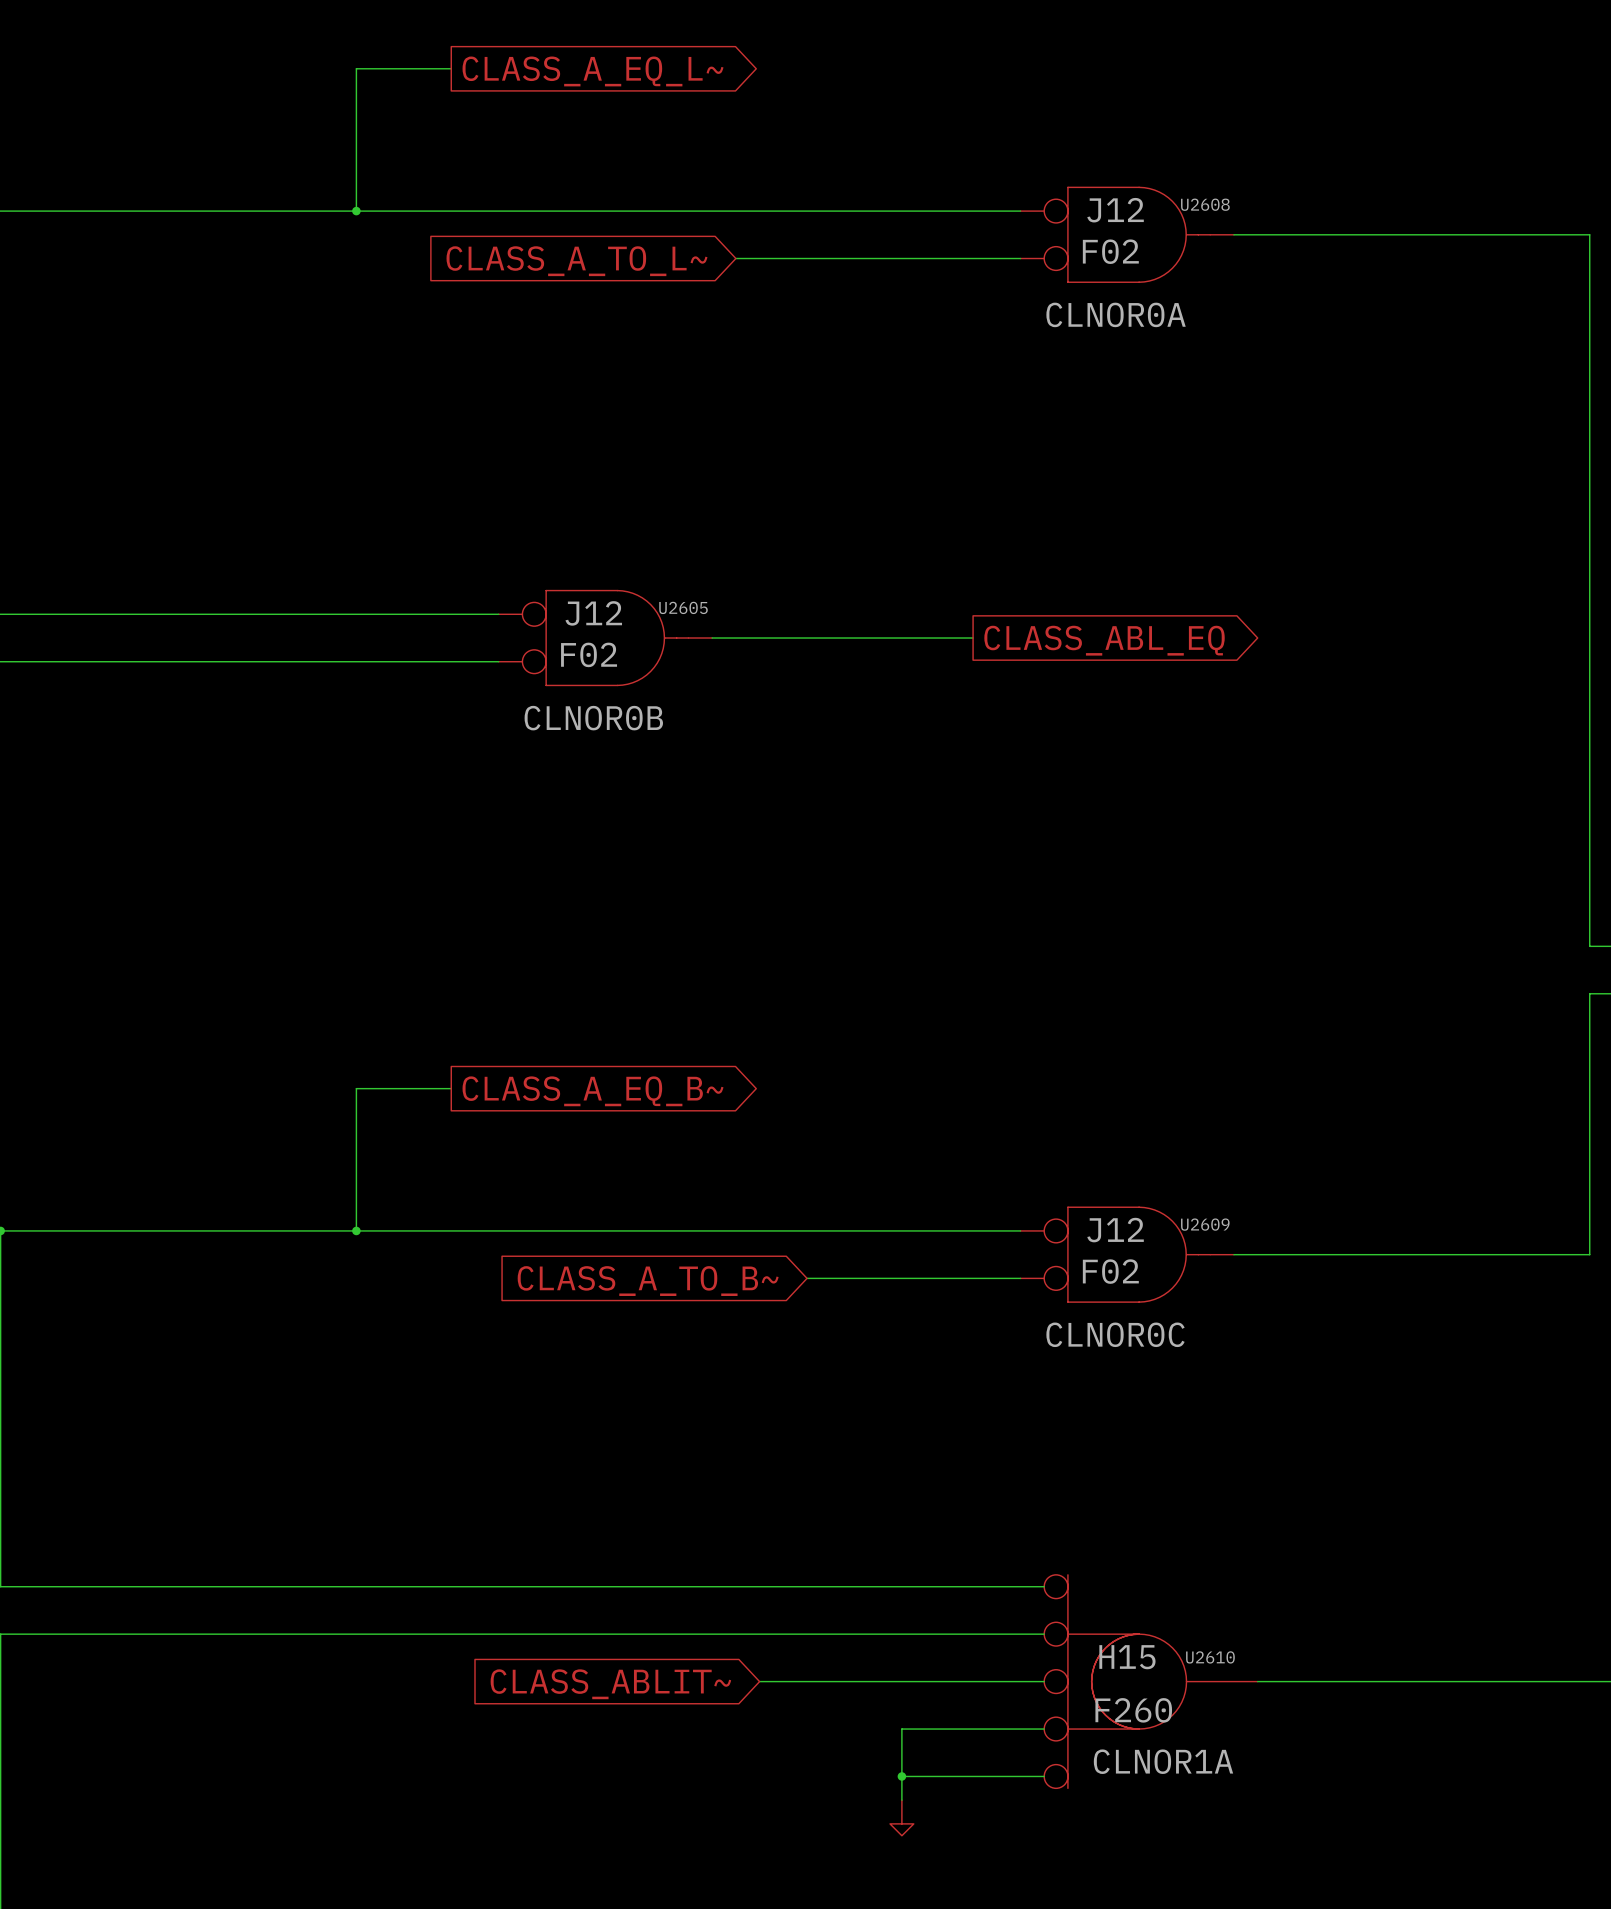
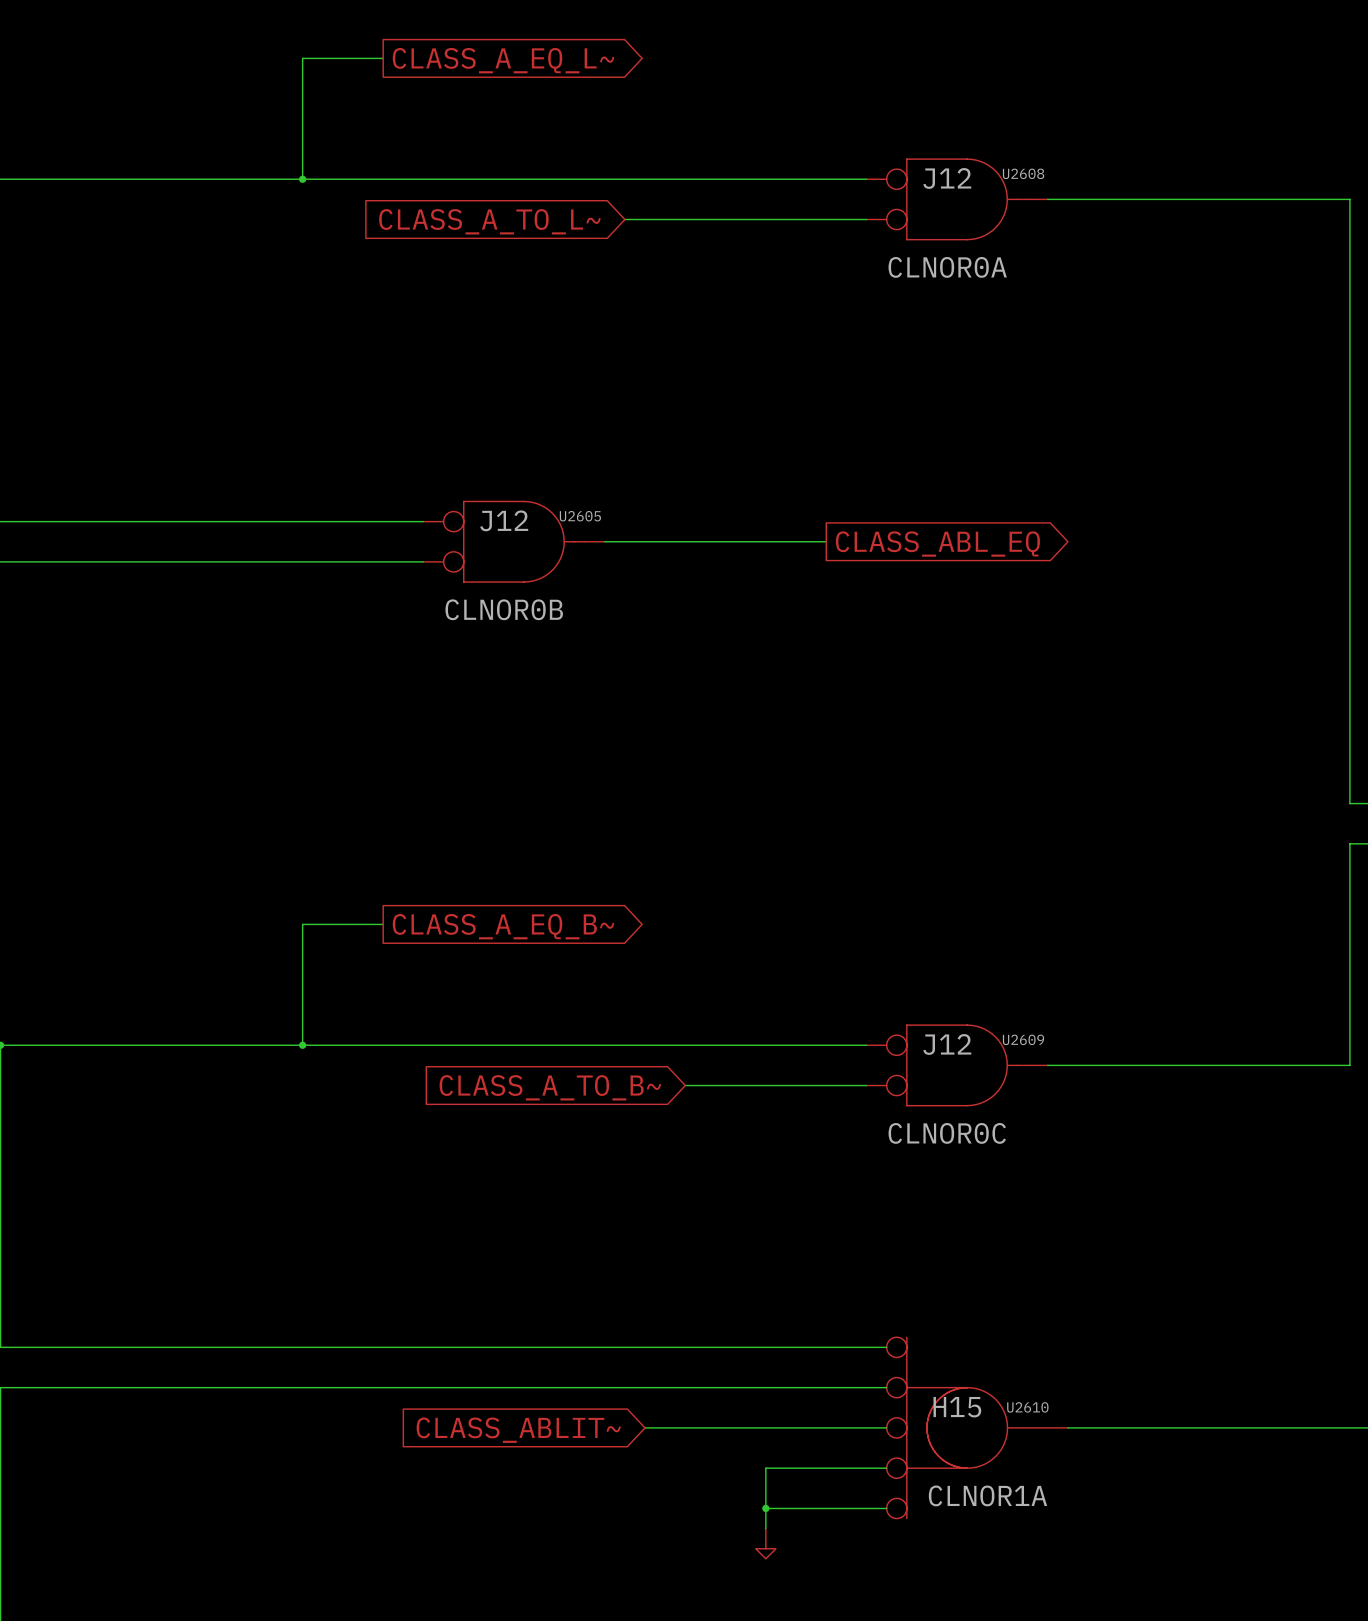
U2608 value: F02 (1110, 251) -> none
U2605 value: F02 (589, 654) -> none
U2609 value: F02 (1110, 1271) -> none
U2610 value: F260 (1133, 1710) -> none

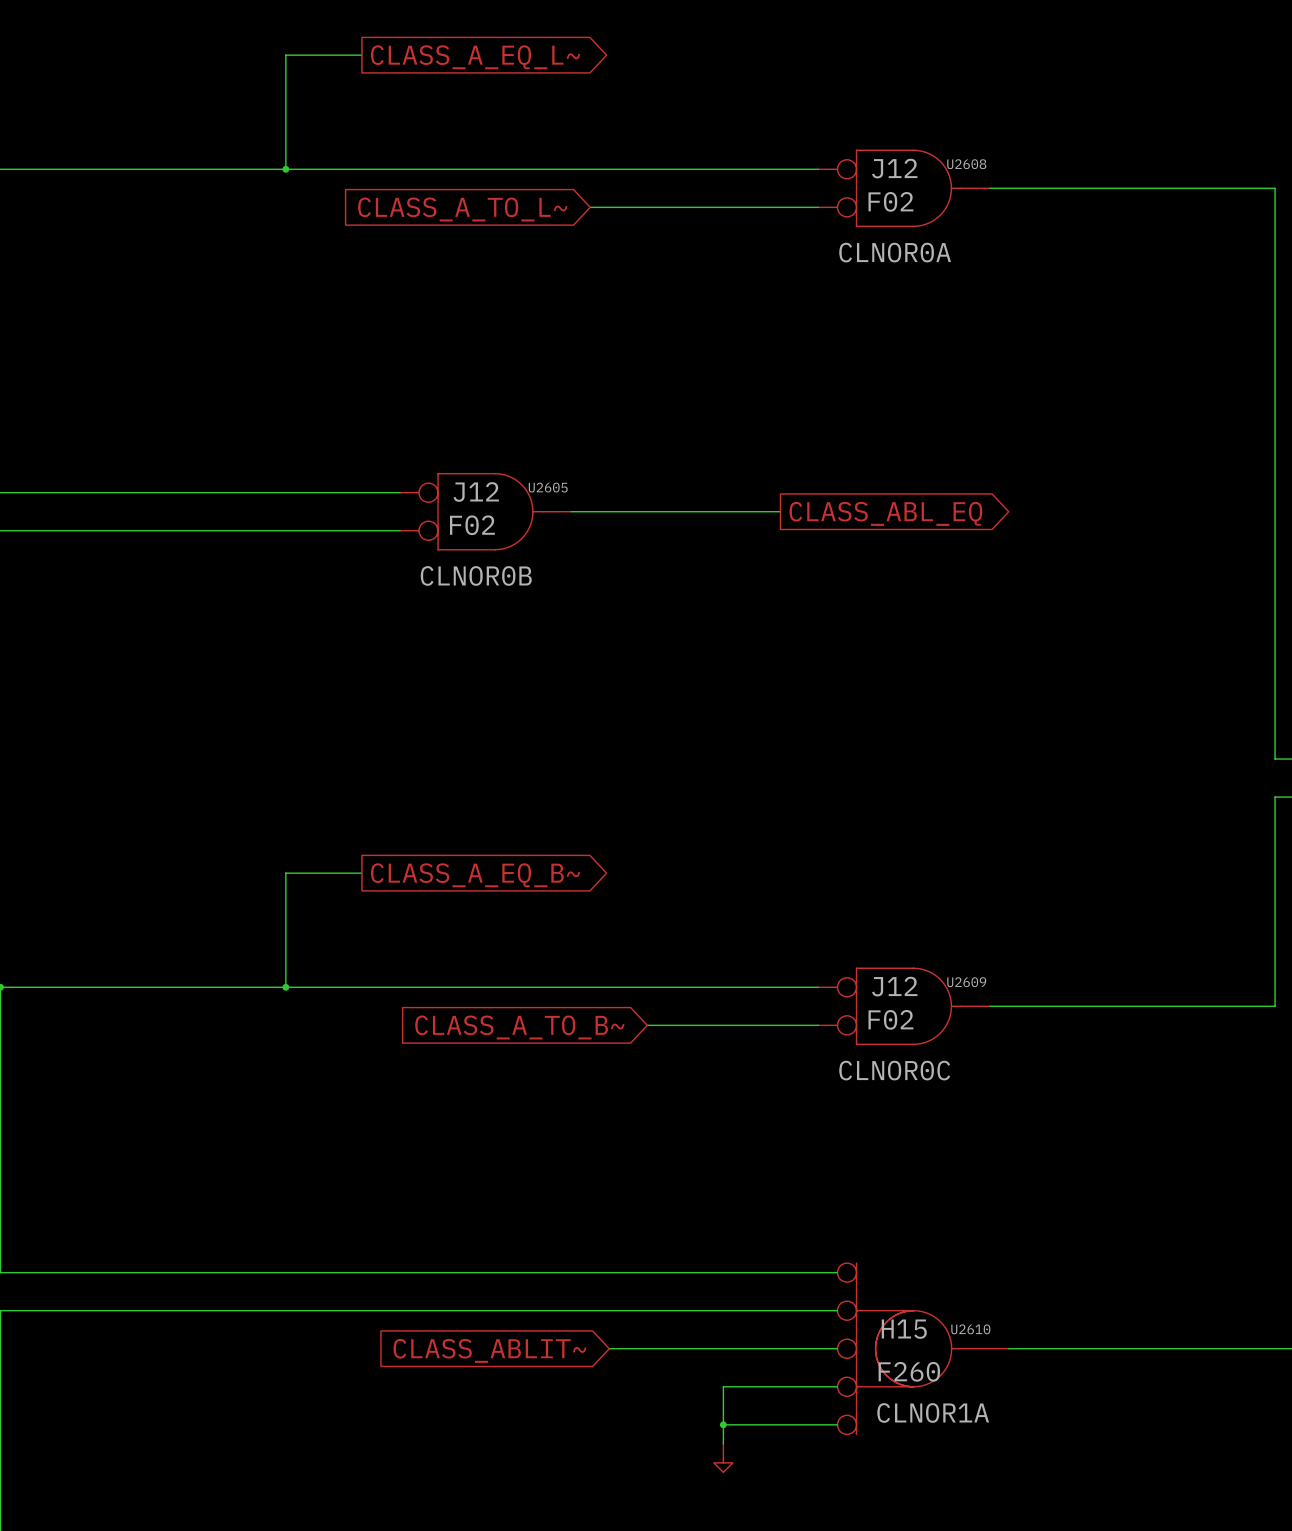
U2608 value: none -> F02 (890, 201)
U2605 value: none -> F02 (472, 525)
U2609 value: none -> F02 (890, 1019)
U2610 value: none -> F260 (909, 1371)

